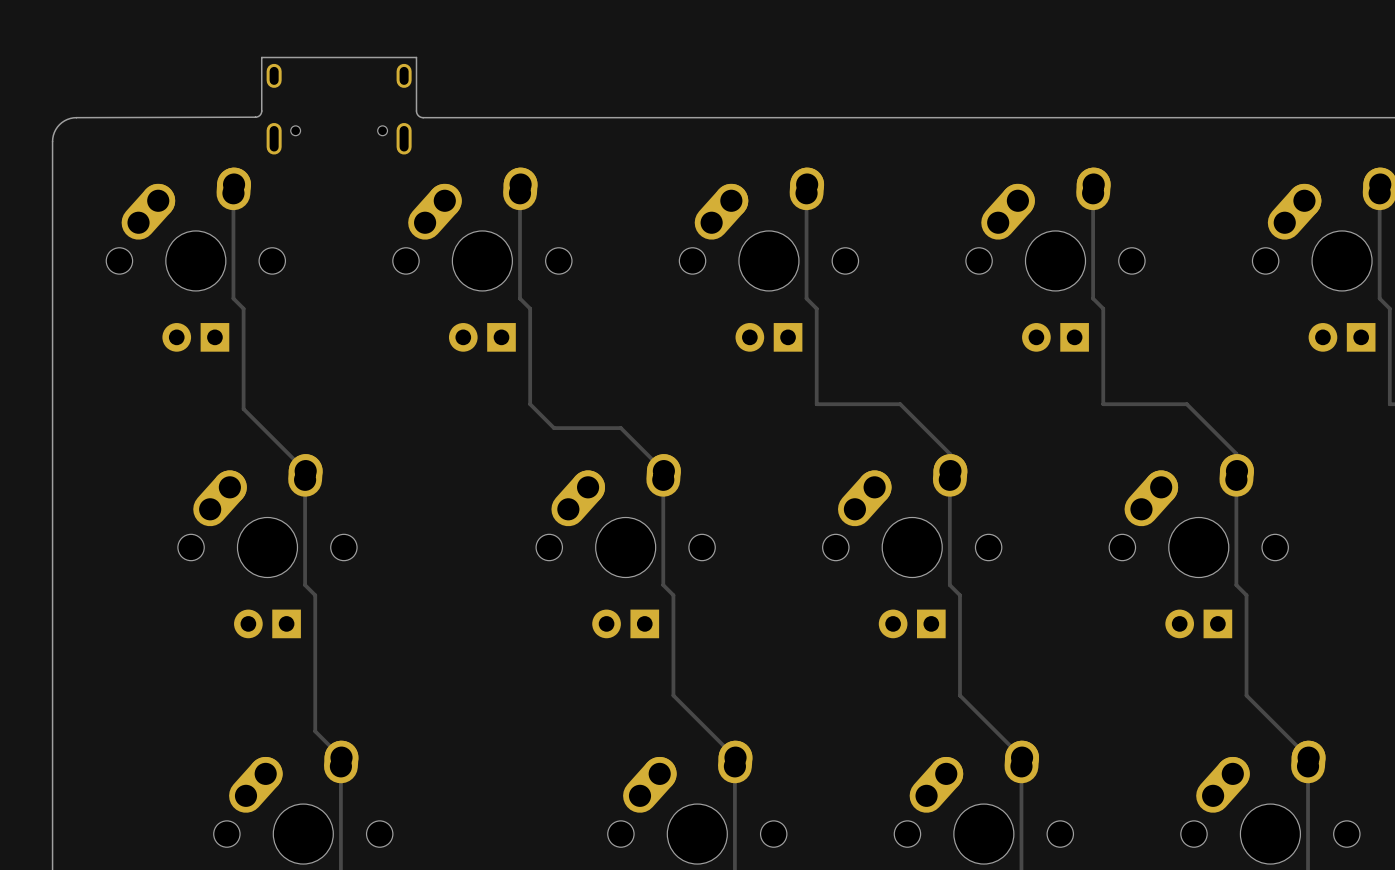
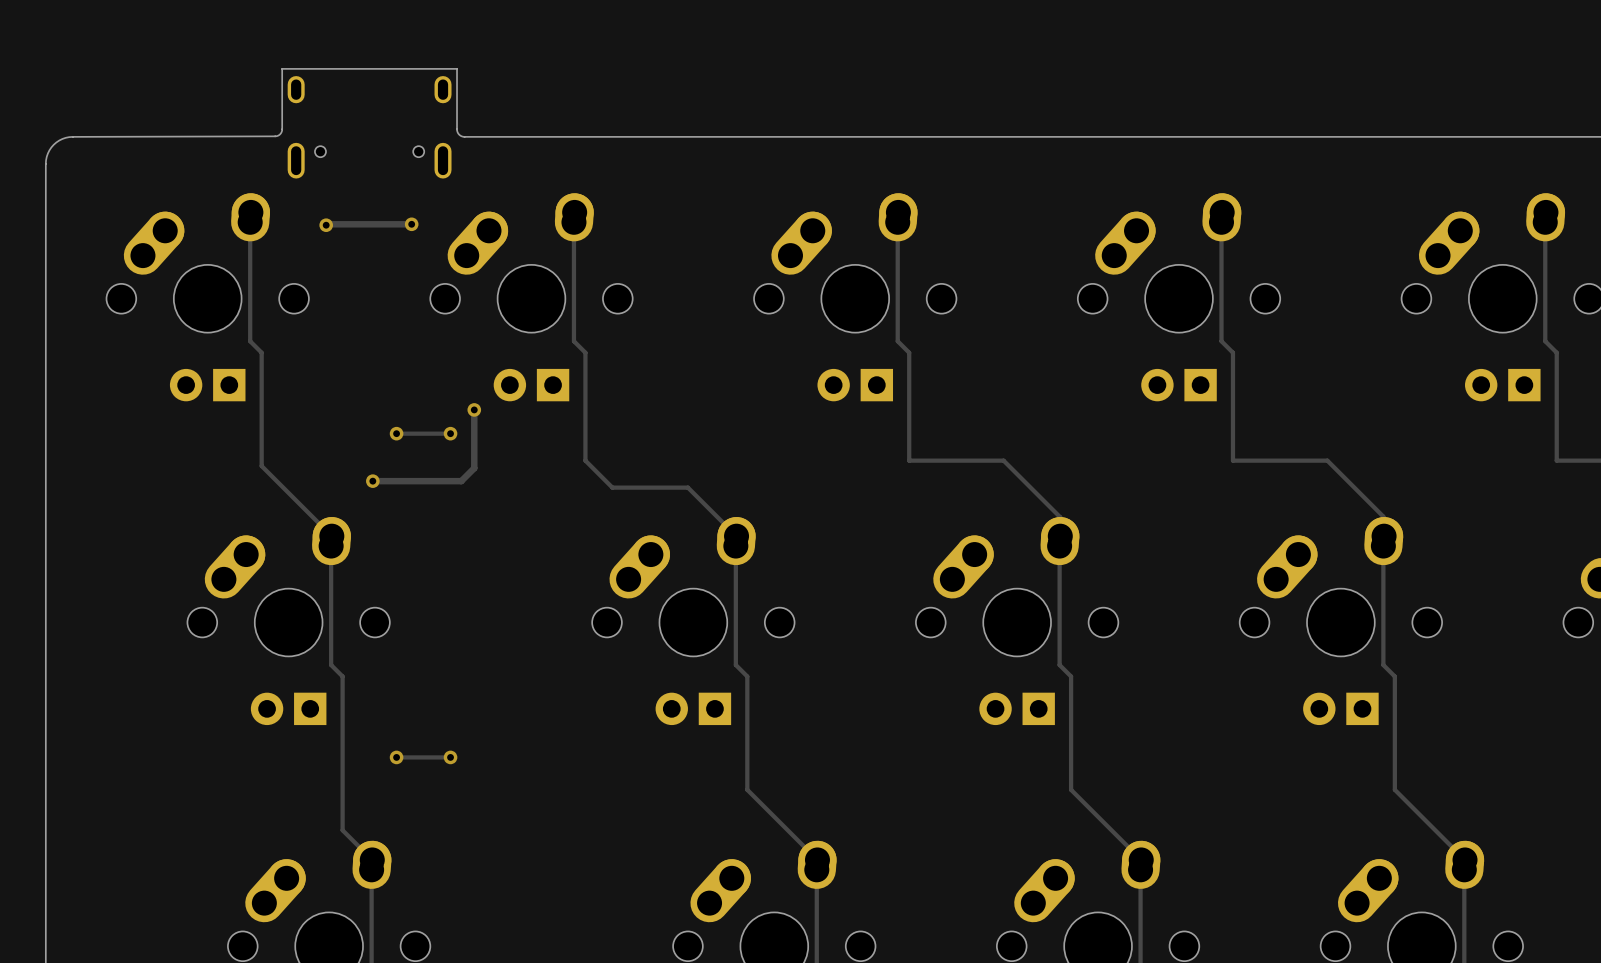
via: none -> (326, 225)
track: none -> (411, 224) (326, 225)
via: none -> (411, 224)
track: none -> (474, 409) (474, 468) (461, 481) (372, 481)
via: none -> (474, 409)
track: none -> (396, 433) (450, 433)
via: none -> (396, 433)
via: none -> (450, 433)
via: none -> (372, 481)
track: none -> (396, 757) (450, 757)
via: none -> (396, 757)
via: none -> (450, 757)

